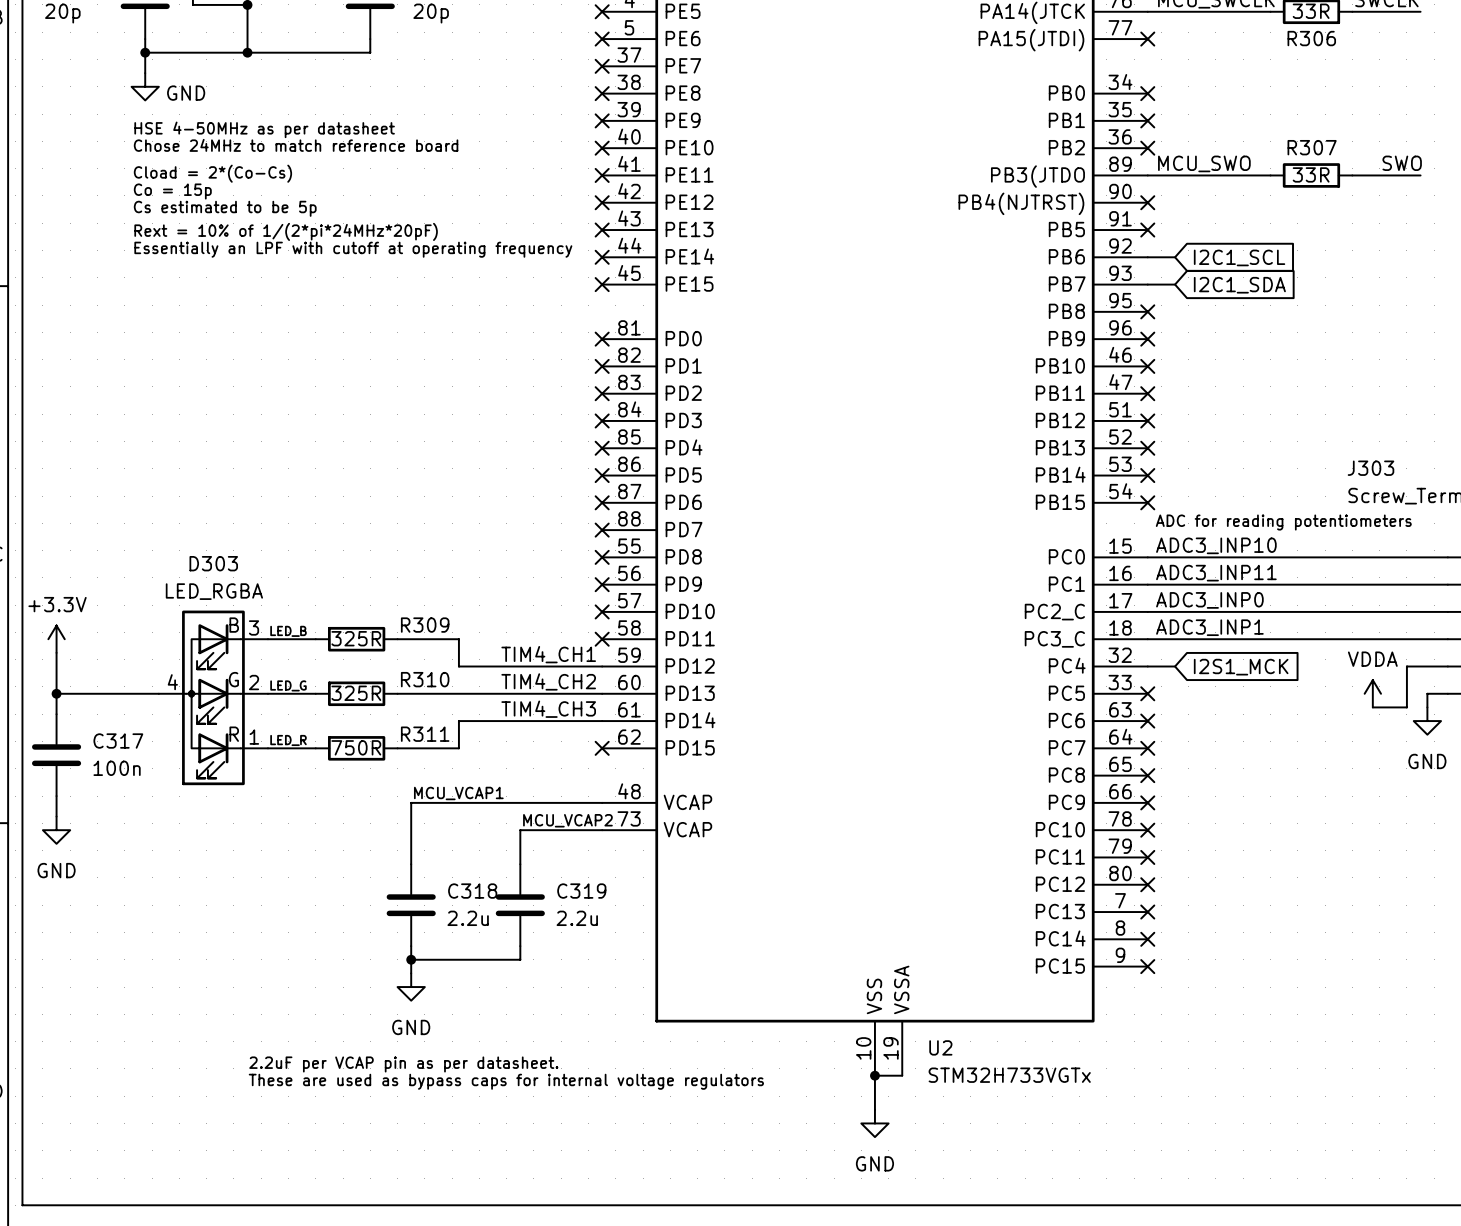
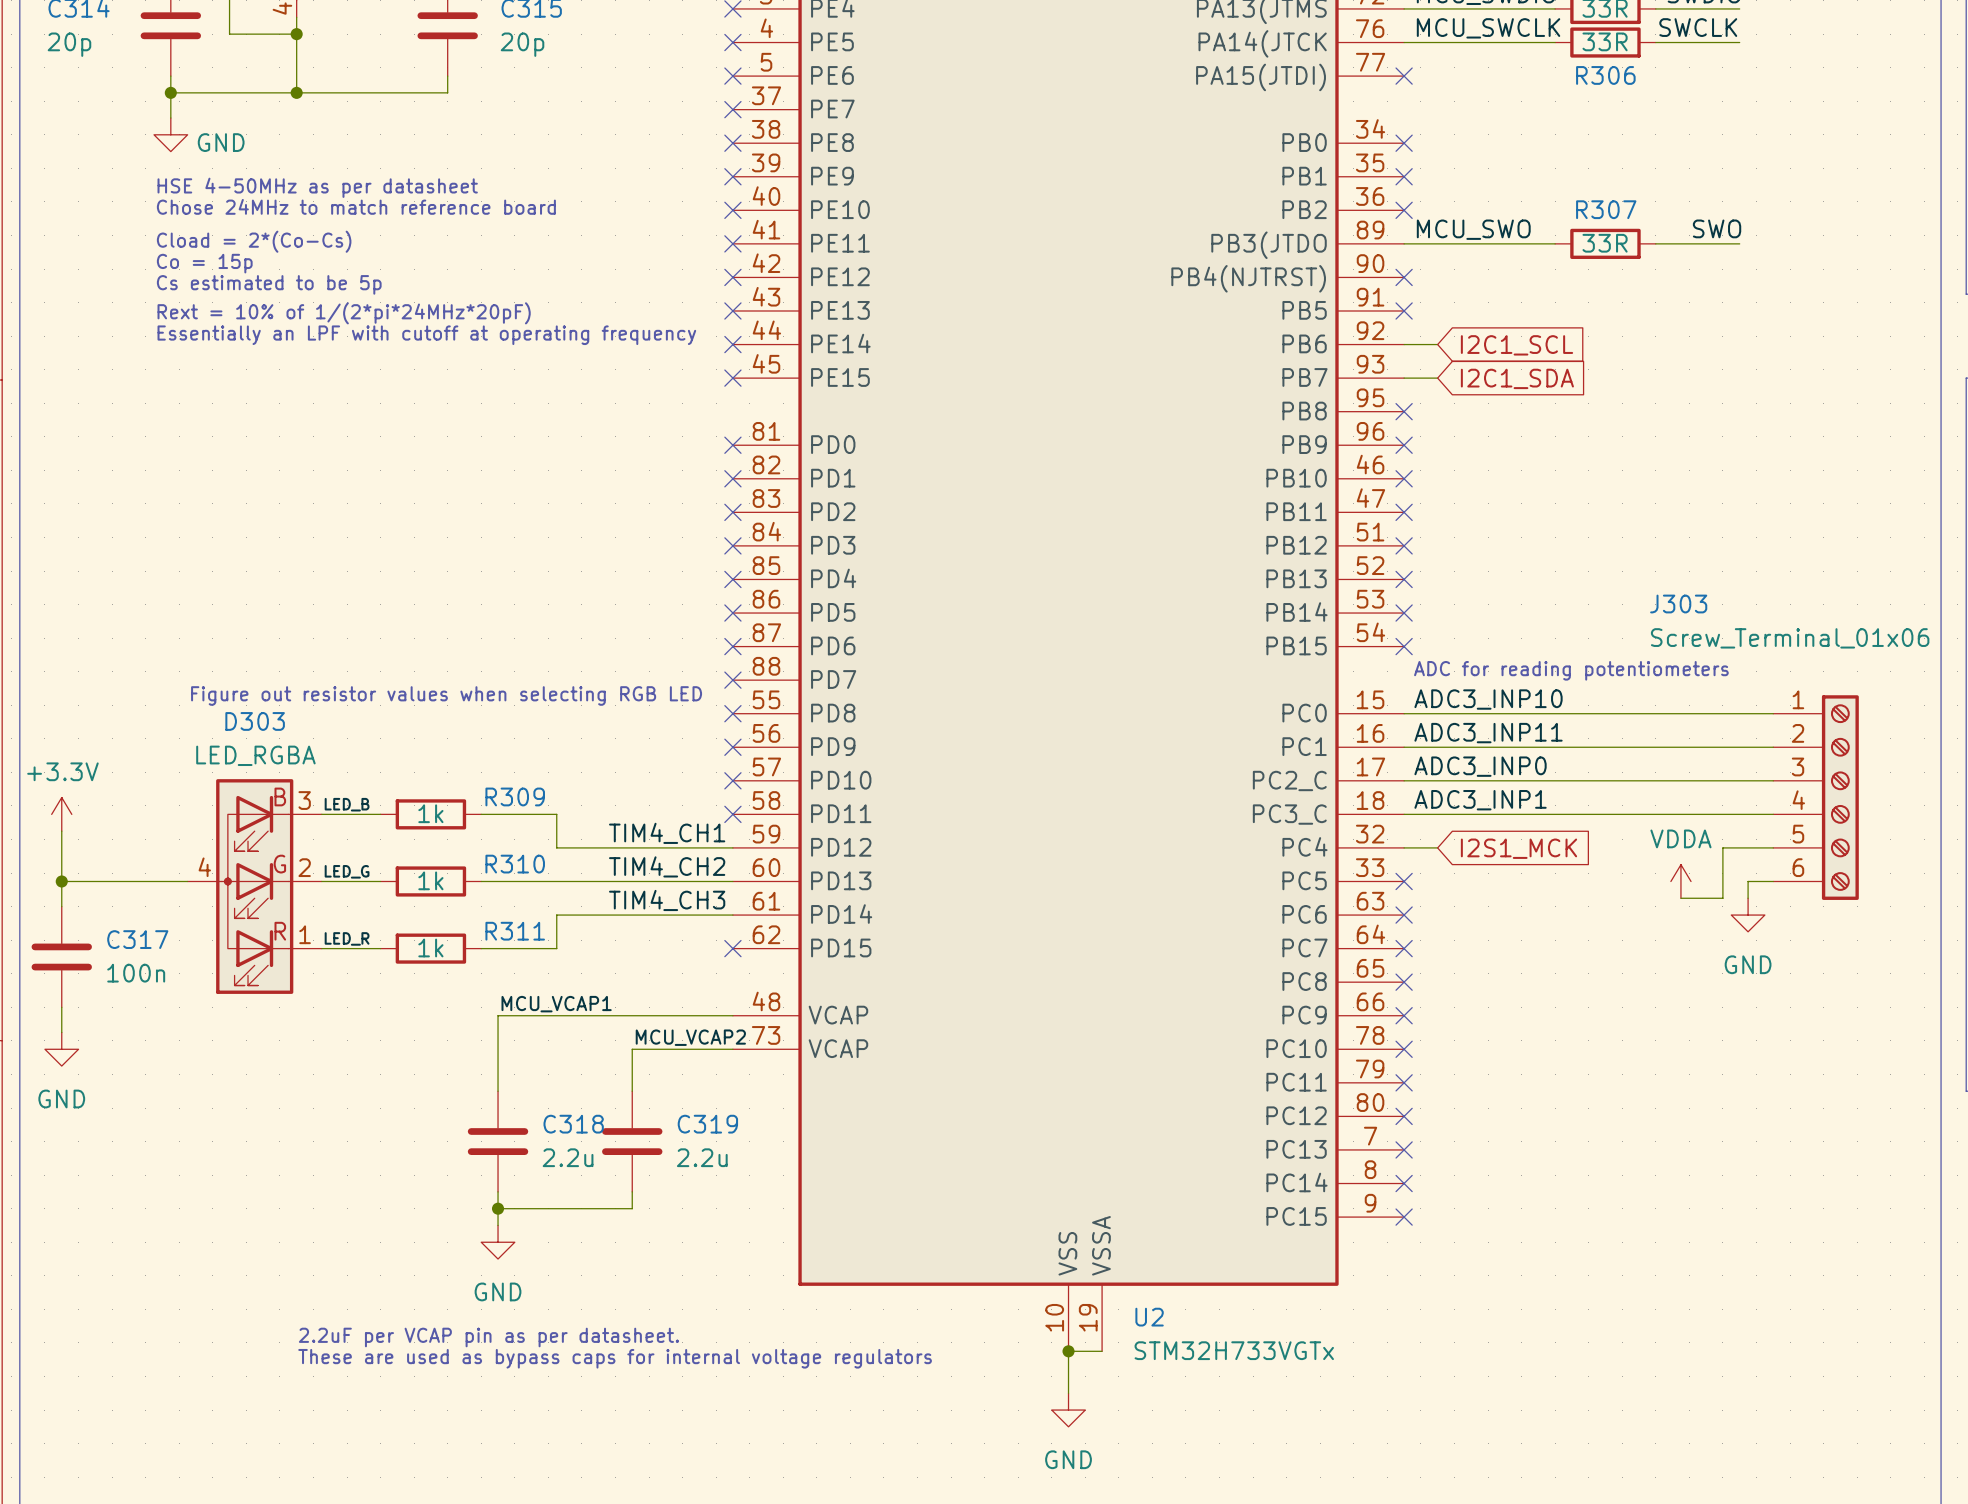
text: none -> Figure out resistor values when selecting RGB LED (446, 695)
R309 value: 325R (356, 638) -> 1k (430, 813)
R310 value: 325R (356, 693) -> 1k (430, 880)
R311 value: 750R (356, 747) -> 1k (430, 947)

